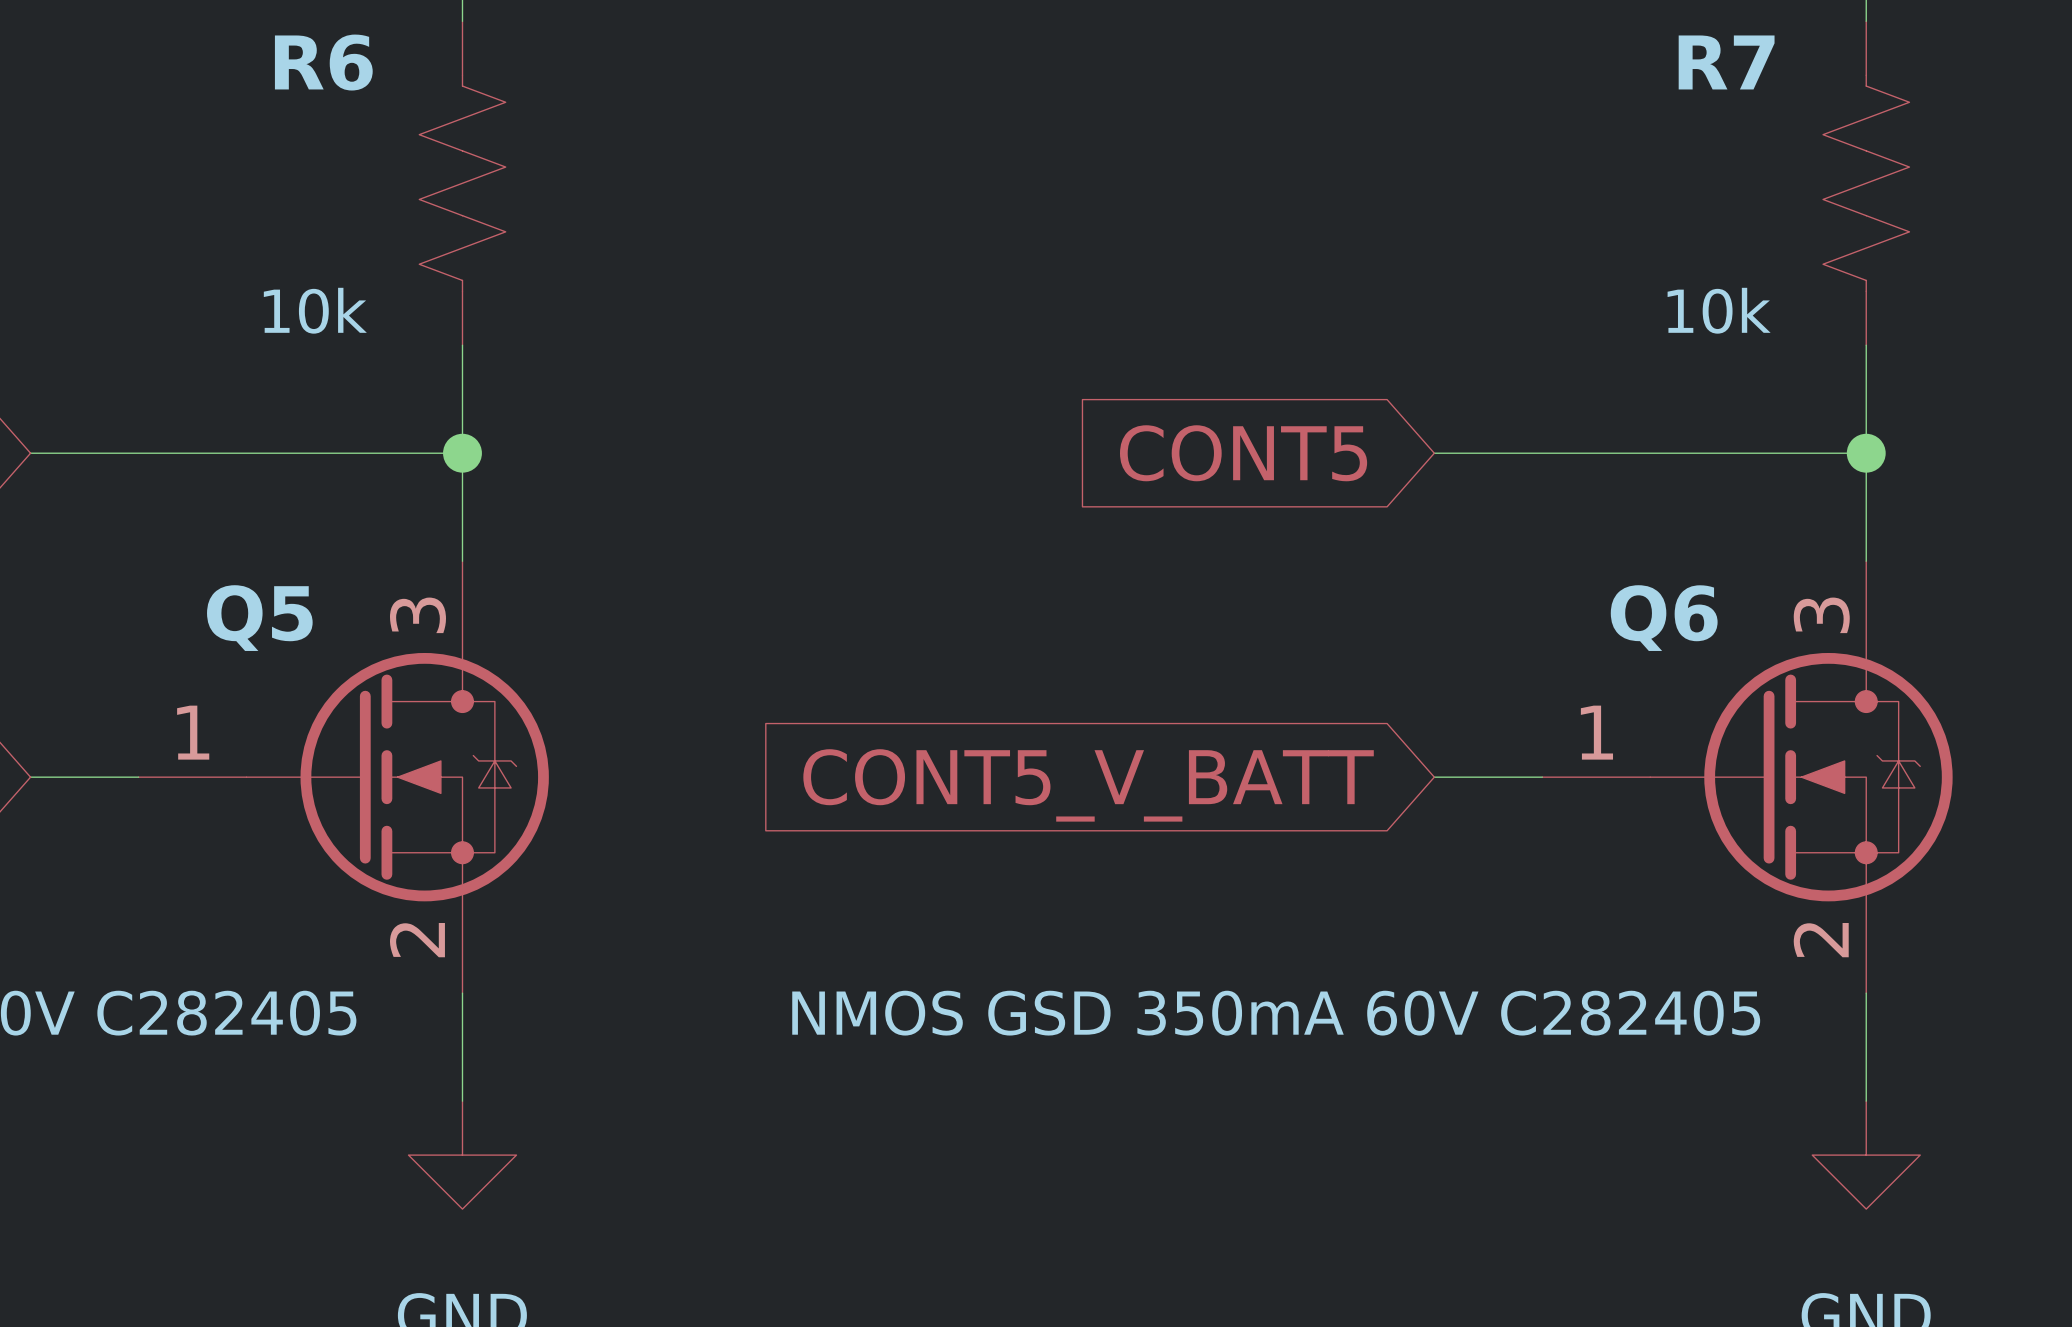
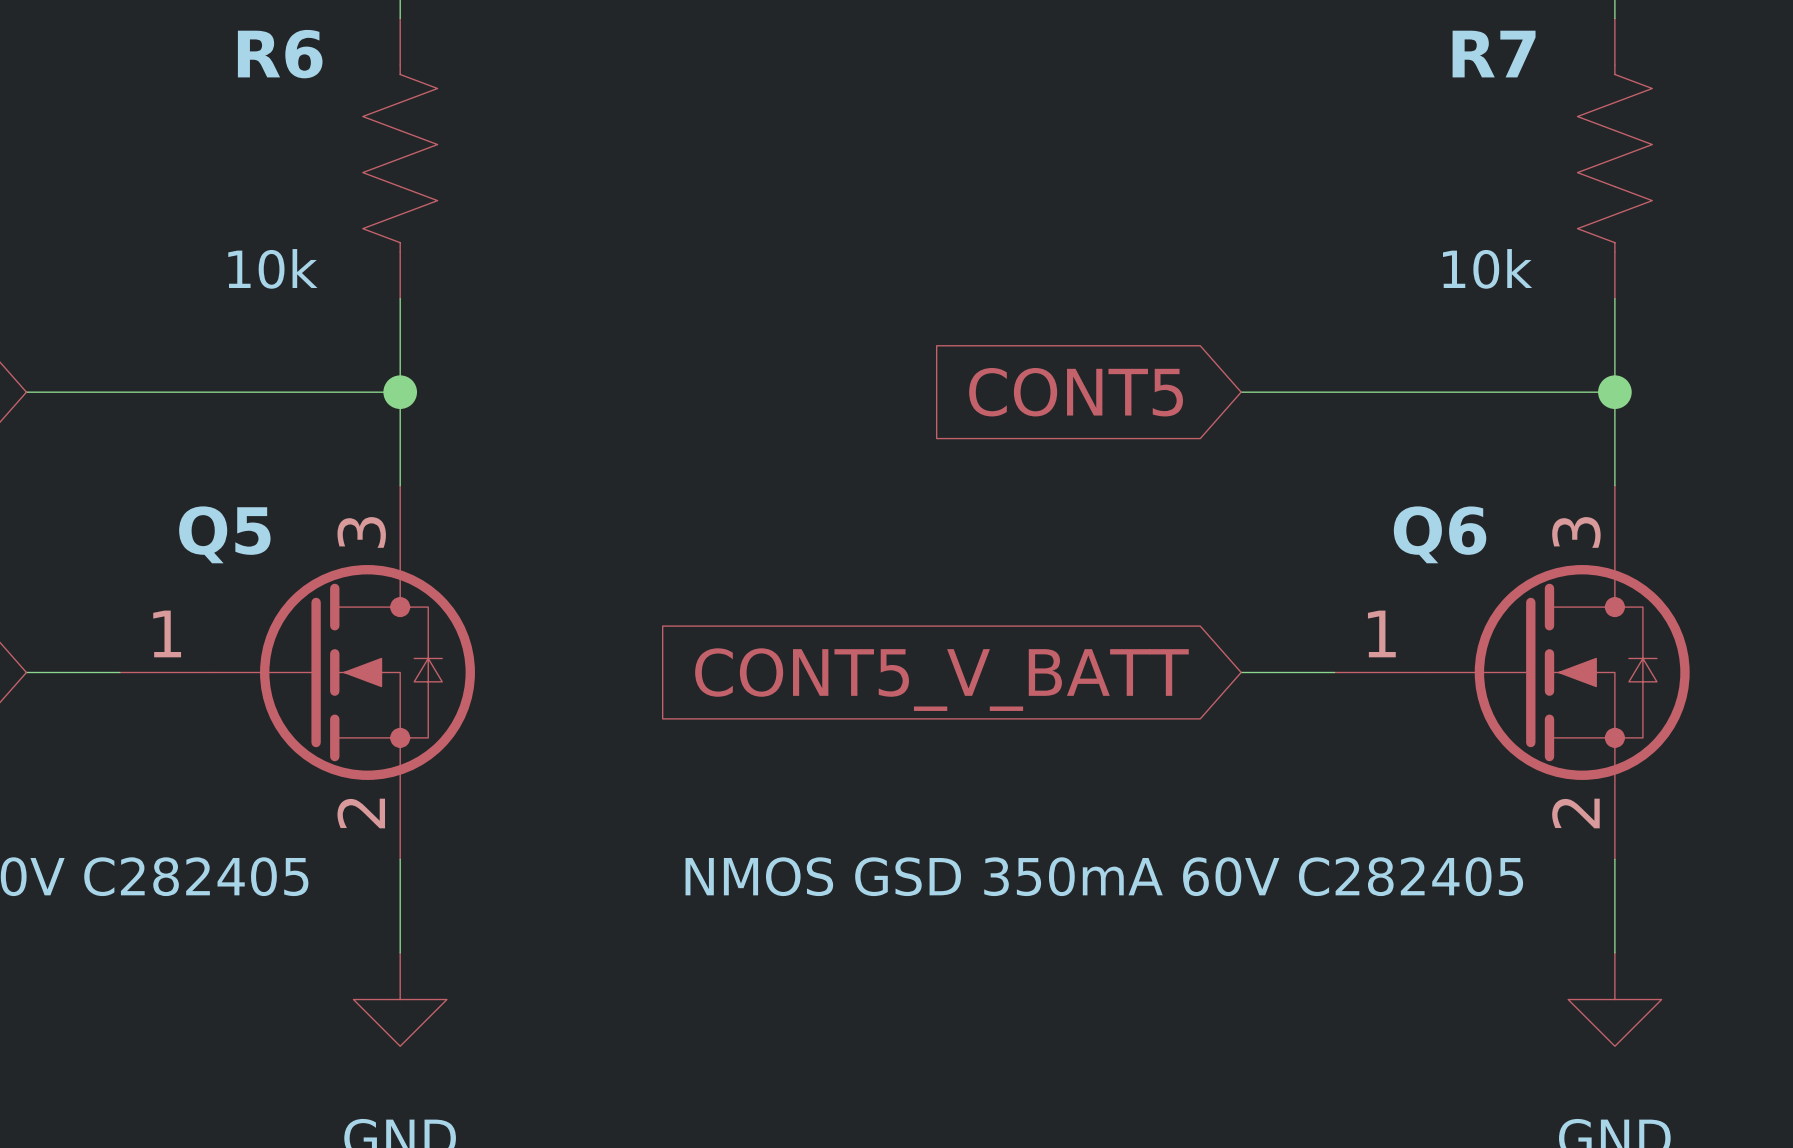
Q5 symbol: [138, 561, 549, 994] -> [119, 485, 475, 860]
Q6 symbol: [1542, 561, 1953, 994] -> [1334, 485, 1690, 860]

